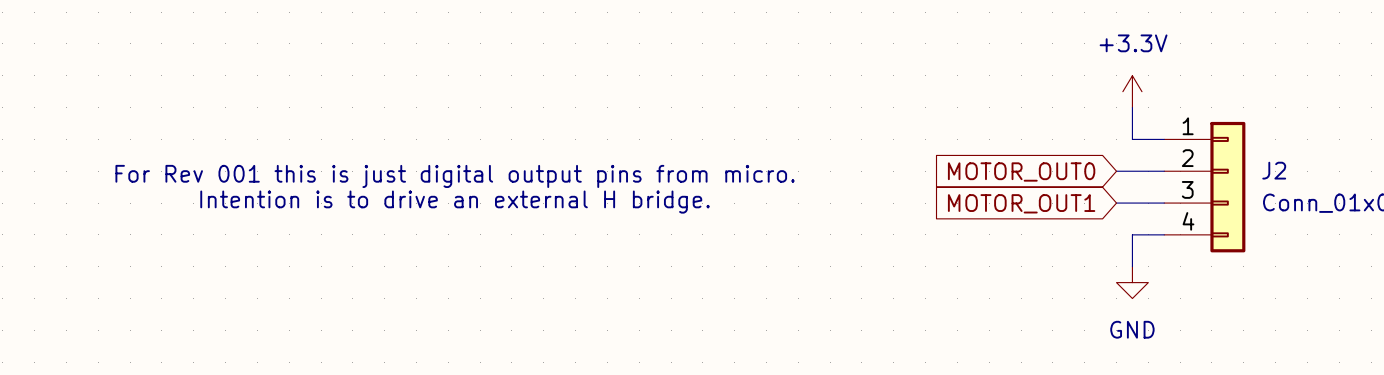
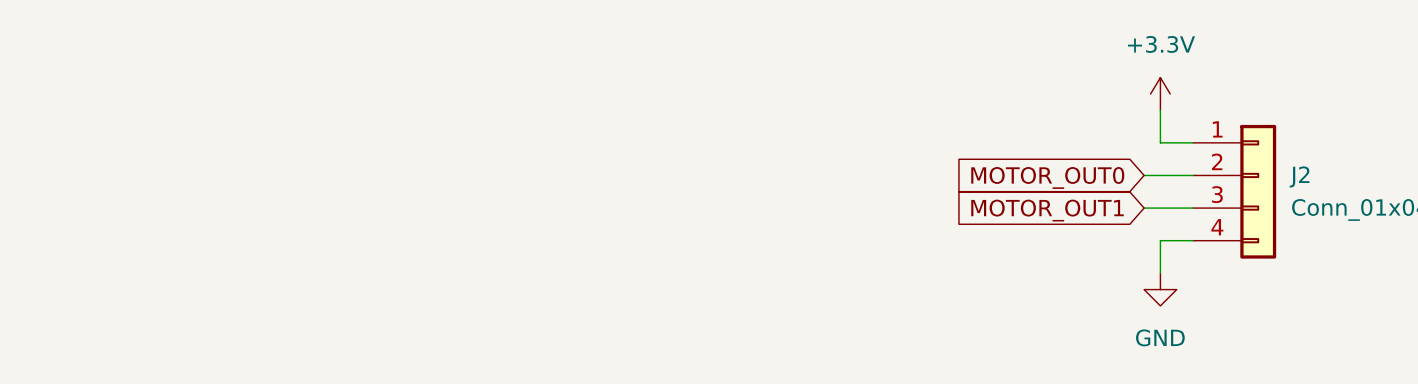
text: For Rev 001 this is just digital output pins from micro. (455, 176) -> none
text: Intention is to drive an external H bridge. (455, 202) -> none

